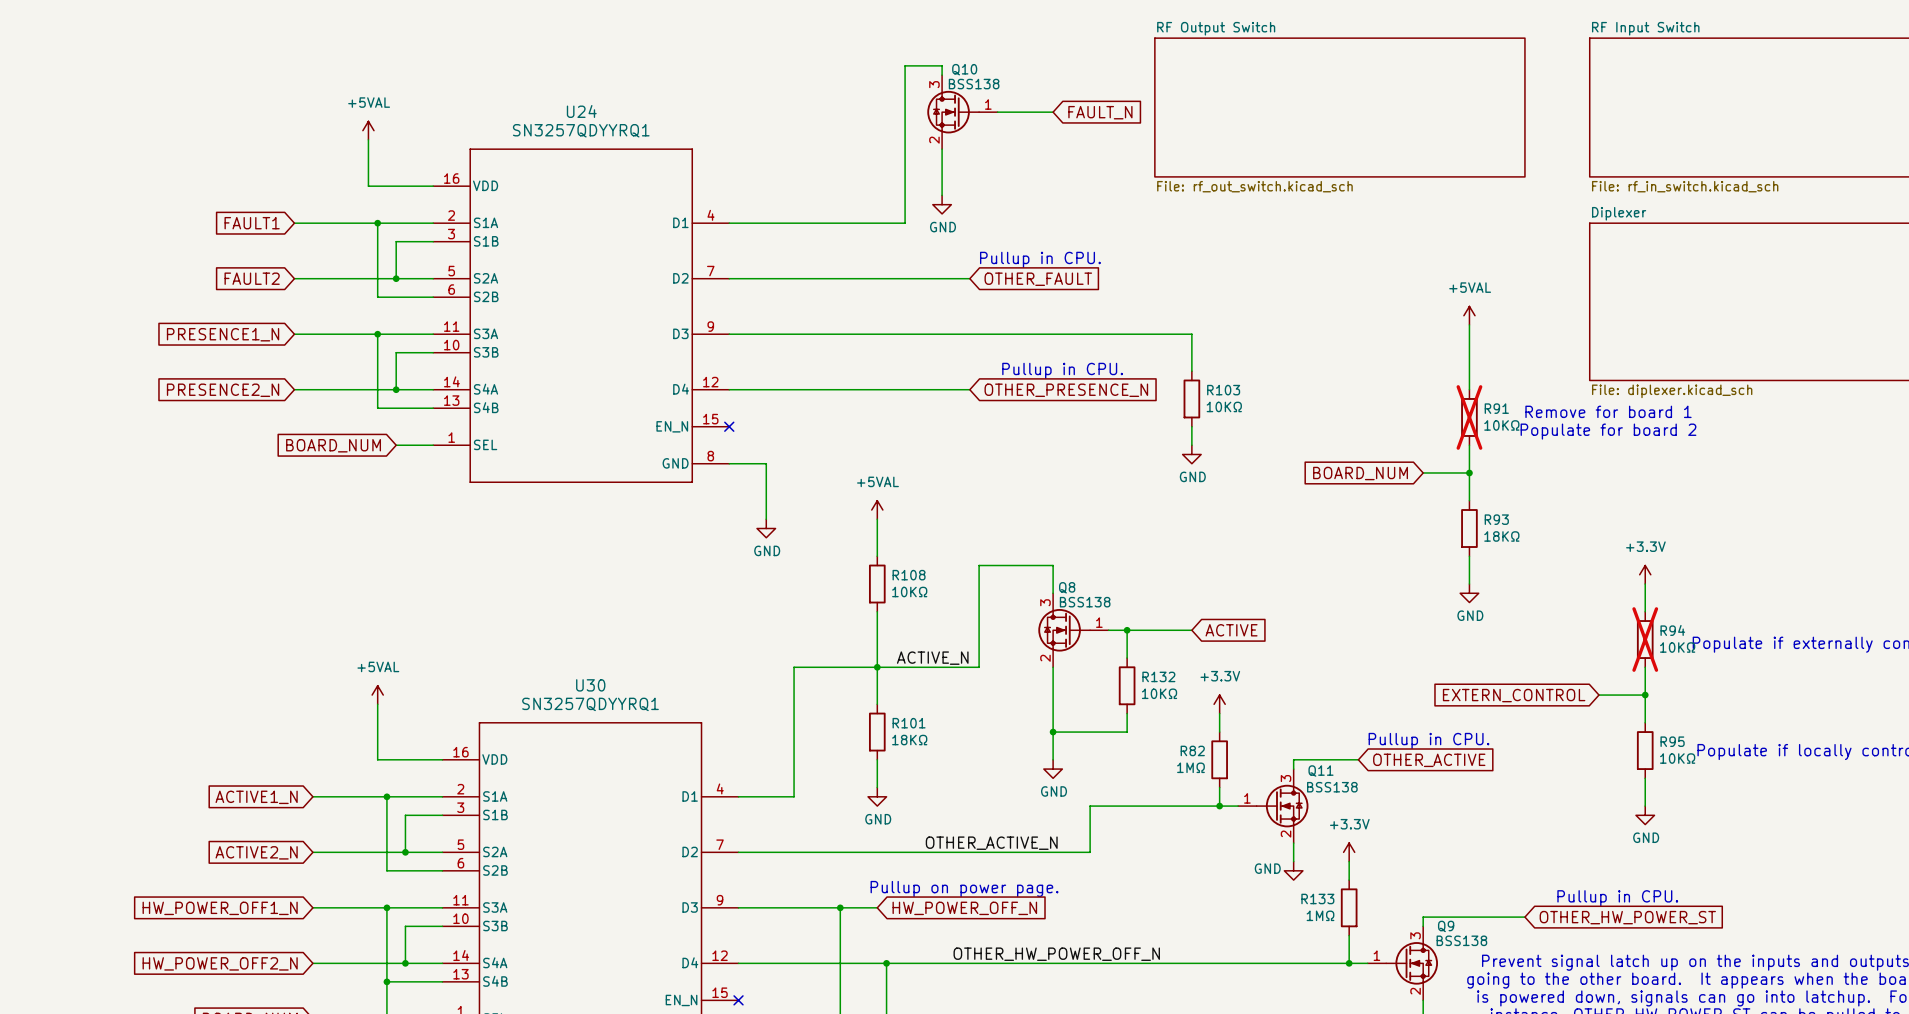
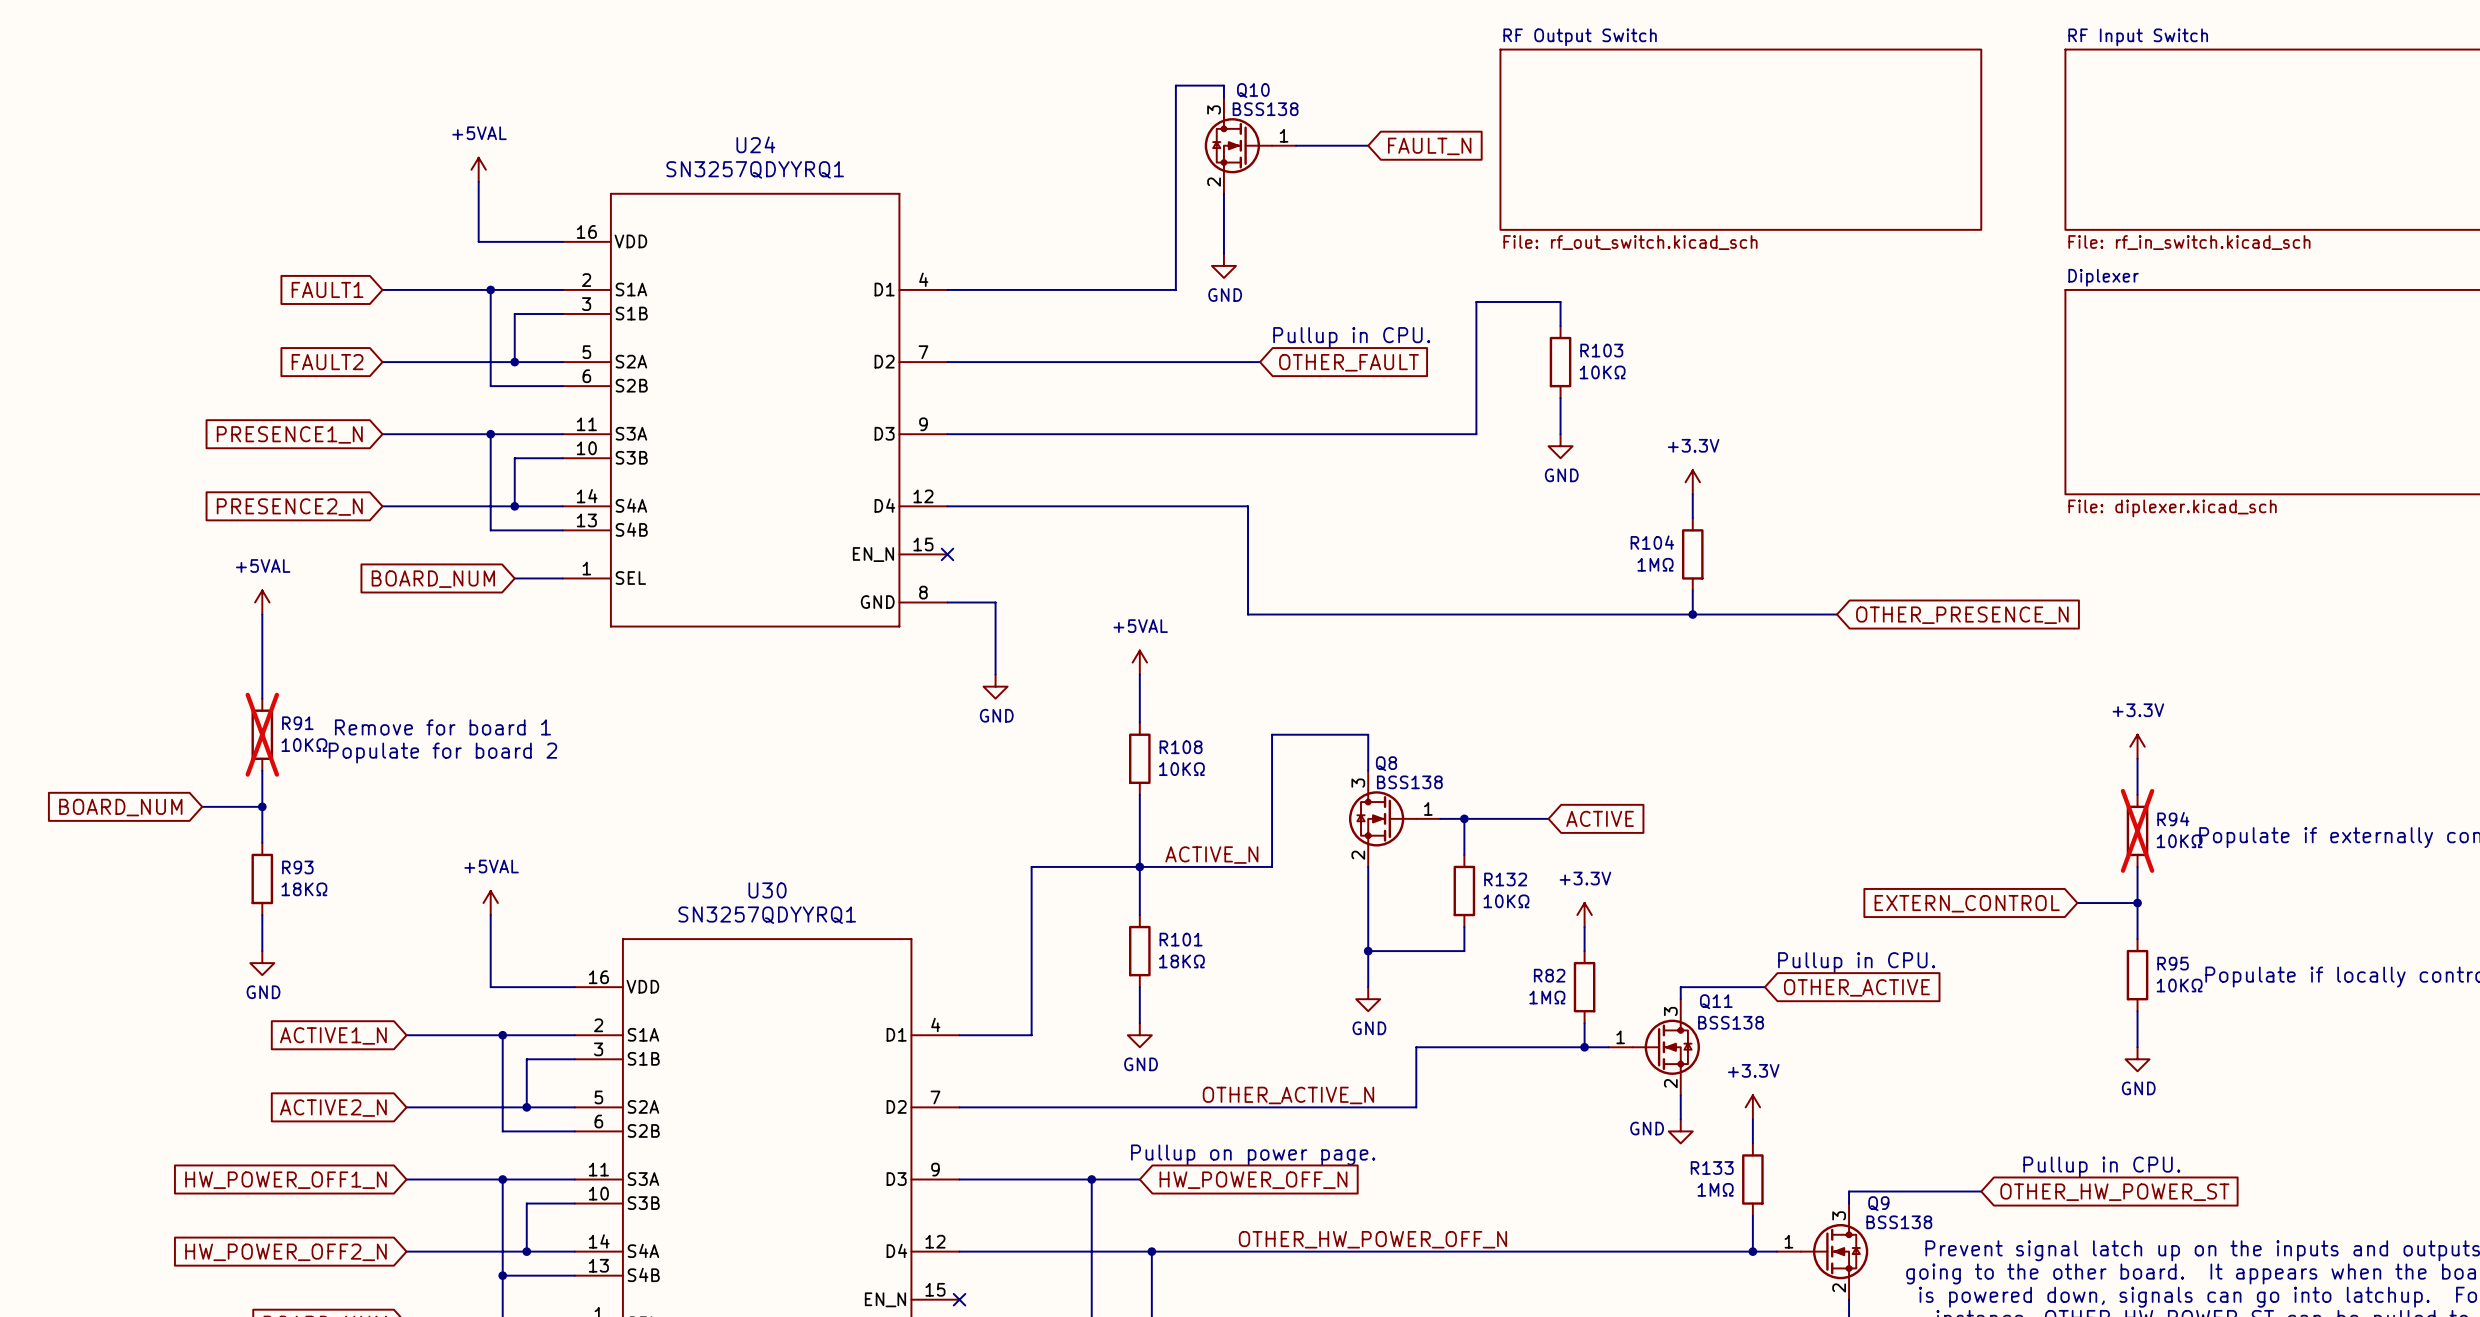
wire: none -> (1560, 398) (1560, 434)
power symbol: +5VAL (1469, 315) -> none
wire: (1469, 324) (1469, 389) -> none
wire: (1136, 334) (1191, 334) (1191, 371) -> (1476, 434) (1476, 301) (1560, 301) (1560, 326)
text: Pullup in CPU. (1062, 370) -> none
power symbol: none -> +3.3V (1692, 482)
wire: none -> (1692, 494) (1692, 518)
wire: (960, 389) (969, 389) -> (1248, 506) (1248, 614) (1837, 614)
global label: OTHER_PRESENCE_N (1066, 390) -> none
R103 position: (1191, 398) -> (1560, 362)
text: Remove for board 1 (1608, 411) -> none
R91 position: (1469, 417) -> (262, 734)
wire: (1191, 426) (1191, 445) -> (1692, 590) (1692, 614)
R104: none -> 1MΩ (1692, 554)
text: Populate for board 2 (1608, 431) -> none
wire: (1469, 445) (1469, 500) -> none
power symbol position: GND (1191, 454) -> GND (1560, 446)
power symbol: none -> +5VAL (262, 602)
wire: none -> (262, 614) (262, 698)
junction: none -> (1692, 614)
wire: (1423, 472) (1469, 472) -> none
junction: (1469, 472) -> none
global label: BOARD_NUM (1360, 473) -> none
global label: none -> OTHER_PRESENCE_N (1962, 615)
R93 position: (1469, 528) -> (262, 878)
wire: (1469, 556) (1469, 584) -> none
text: none -> Remove for board 1 (442, 727)
text: none -> Populate for board 2 (442, 753)
wire: none -> (262, 770) (262, 842)
power symbol: GND (1469, 593) -> none
global label: none -> BOARD_NUM (120, 807)
wire: none -> (202, 806) (262, 806)
junction: none -> (262, 806)
wire: none -> (262, 915) (262, 951)
power symbol: none -> GND (262, 963)

